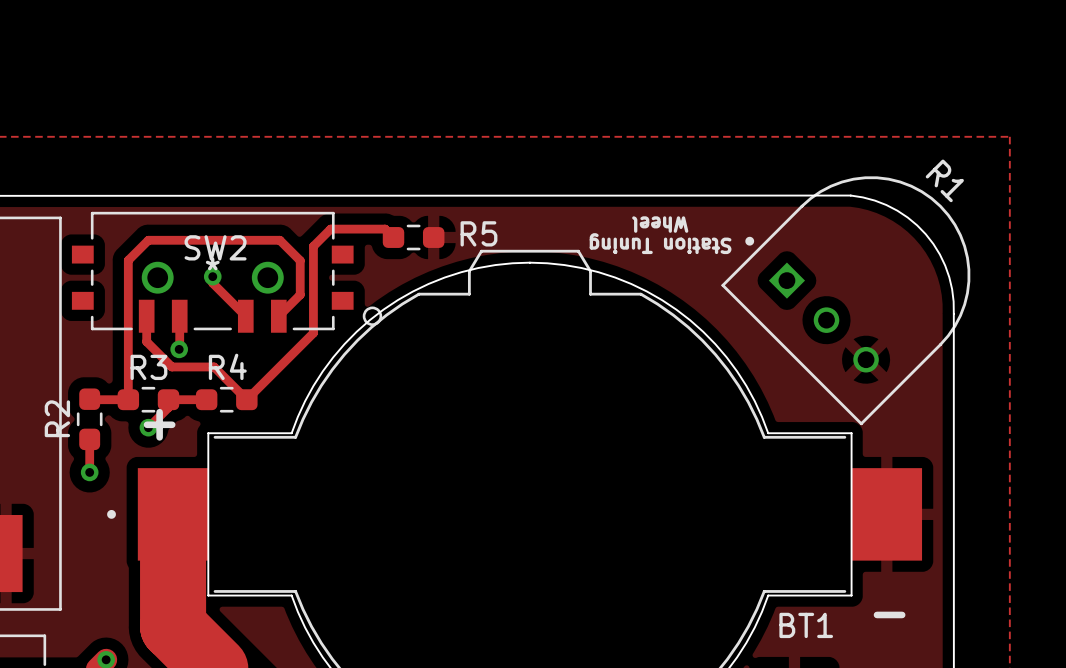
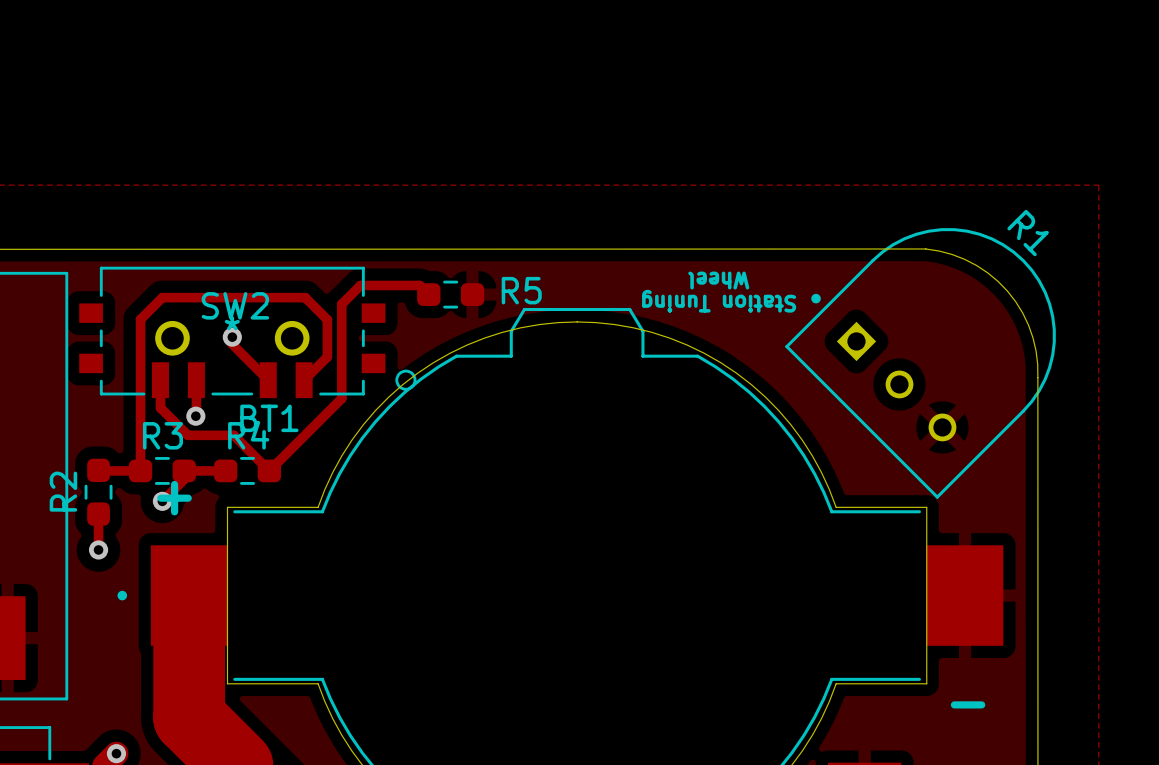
BT1 name position: BT1 (806, 625) -> BT1 (269, 418)

